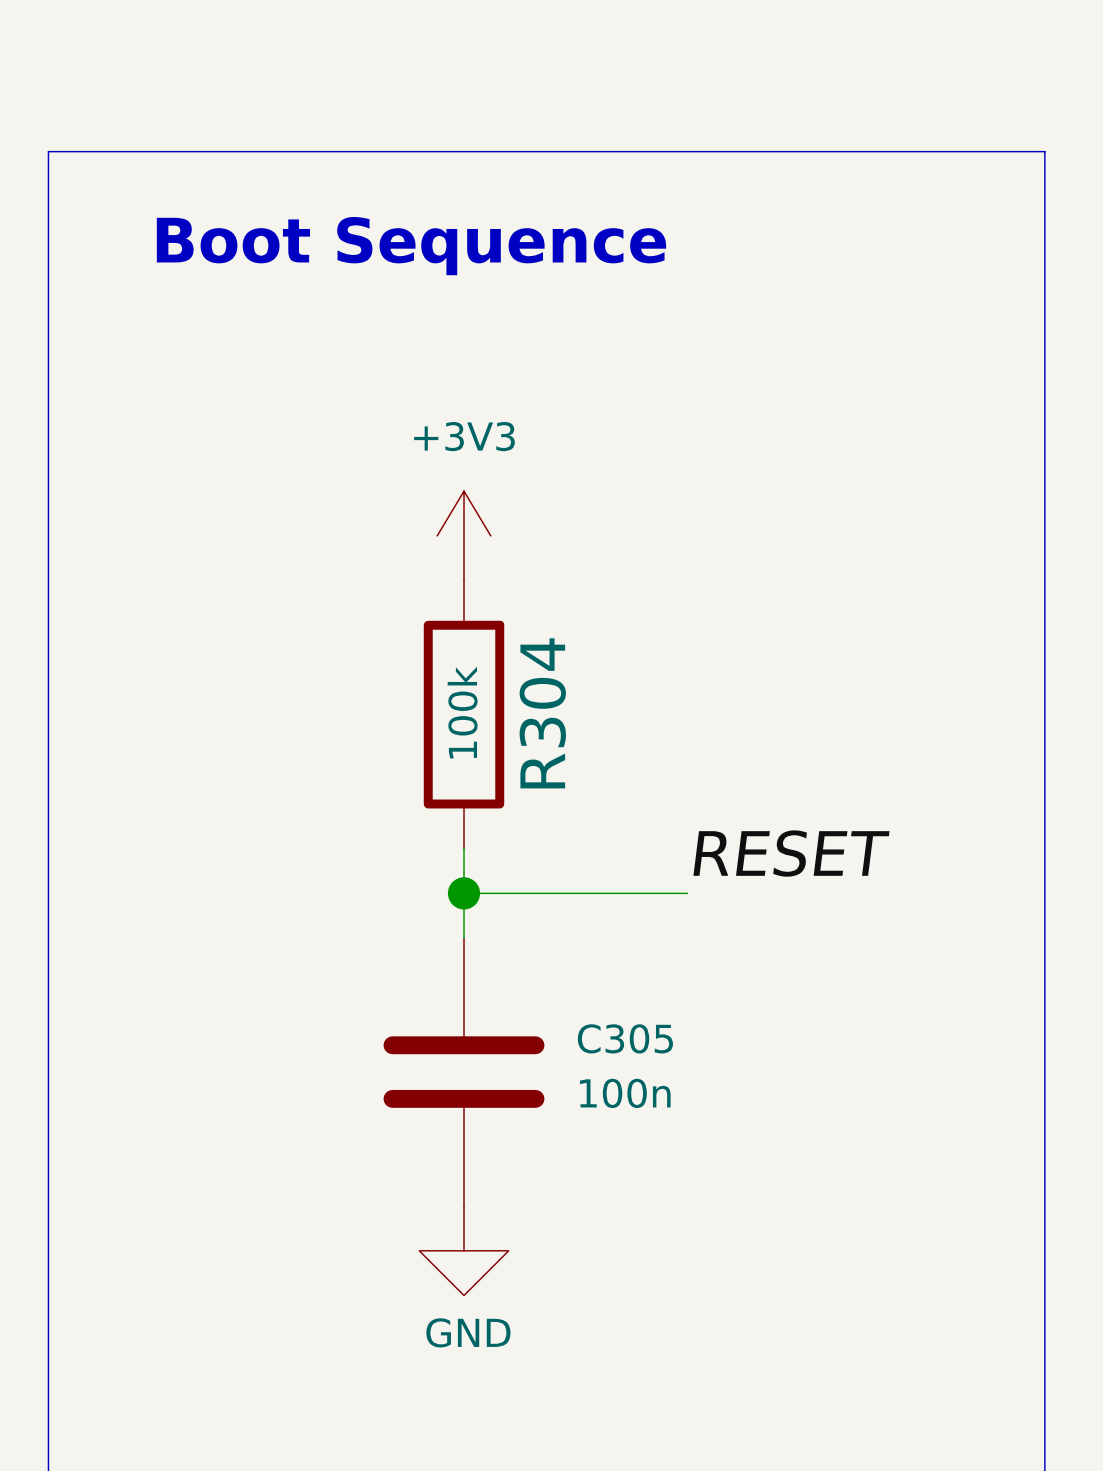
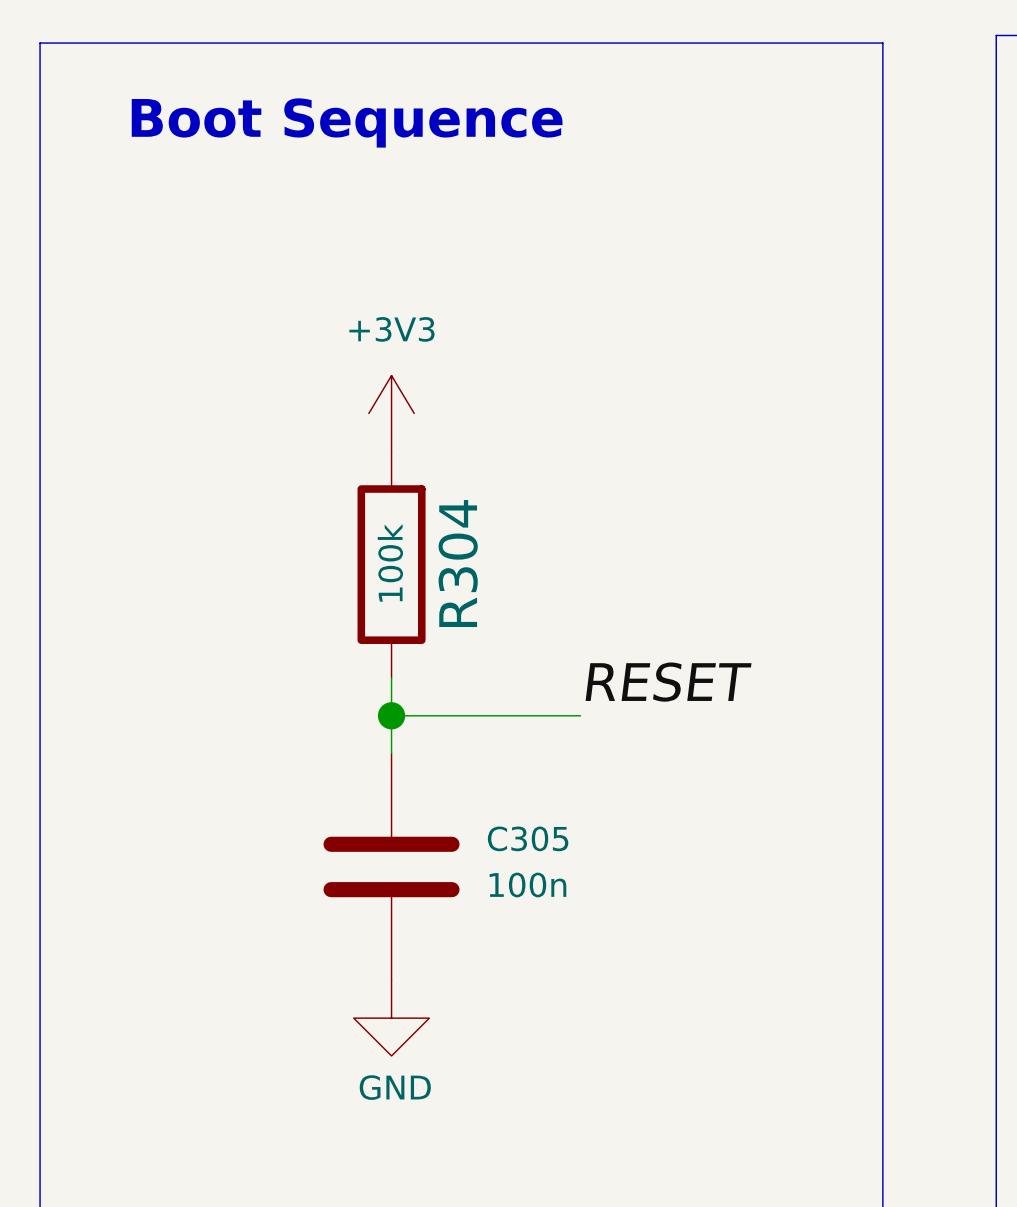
line: (48, 151) (1044, 151) -> (40, 88) (40, 43) (882, 43) (882, 88)
text position: Boot Sequence (411, 246) -> Boot Sequence (347, 122)

